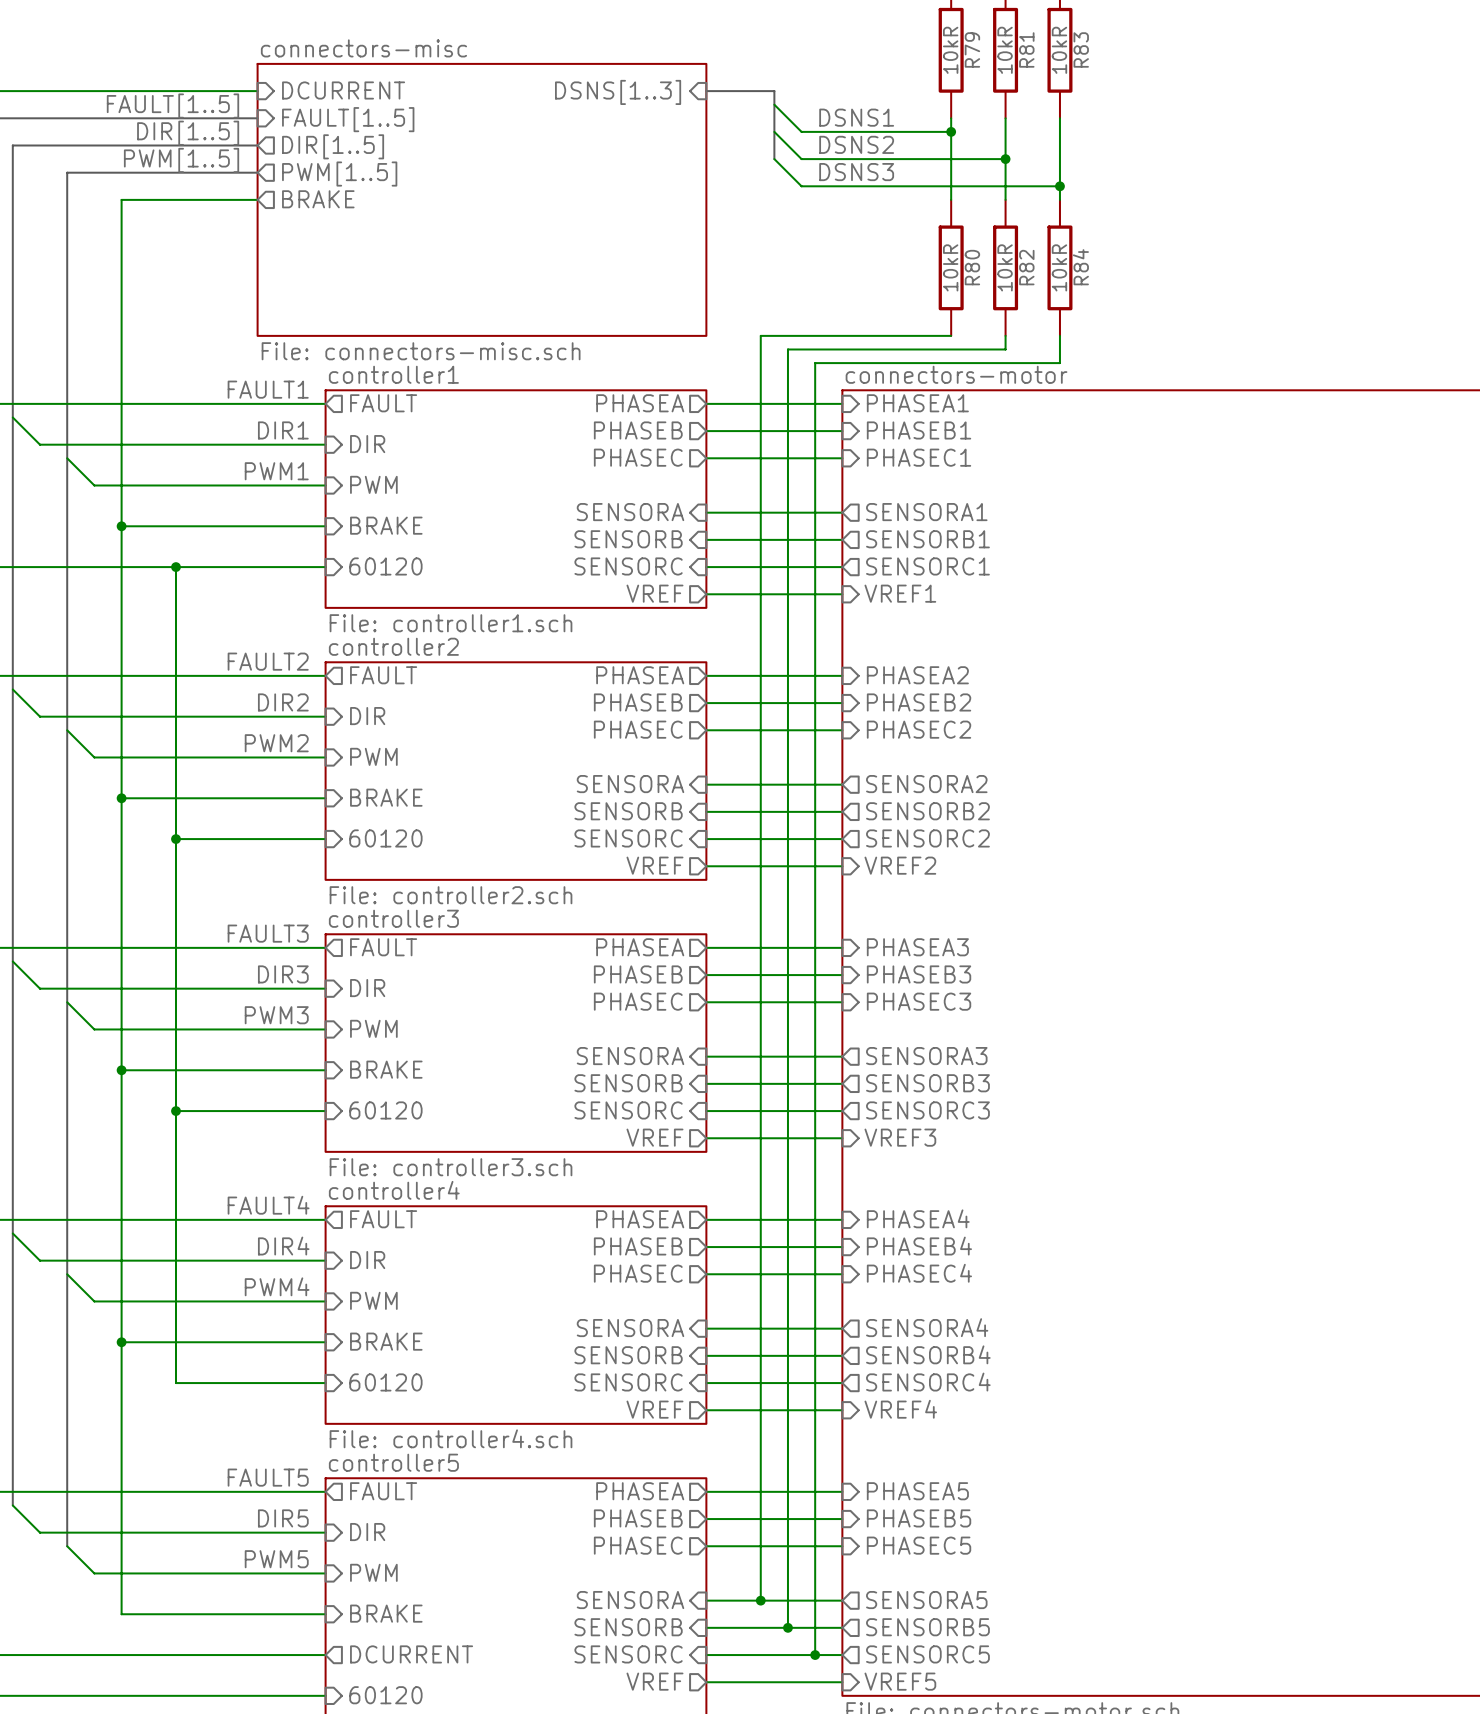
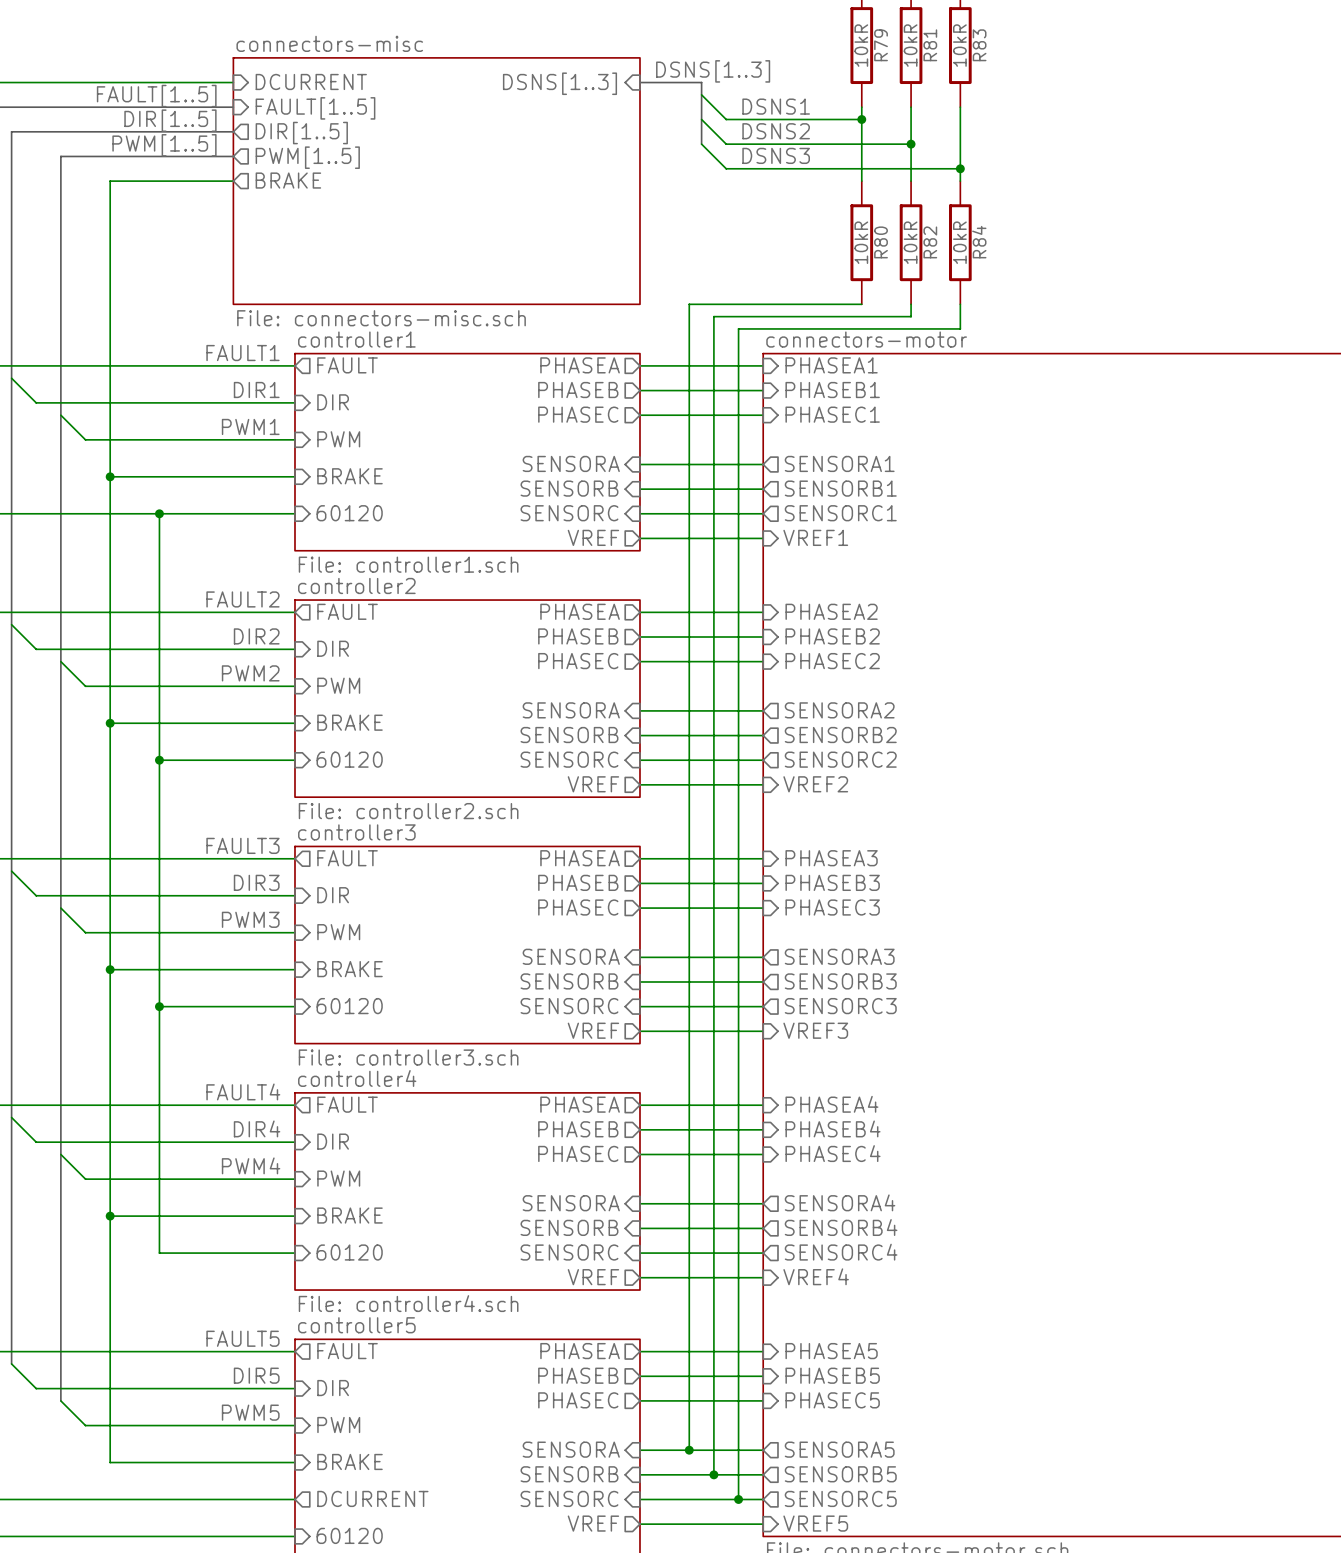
label: none -> DSNS[1..3] (713, 71)

